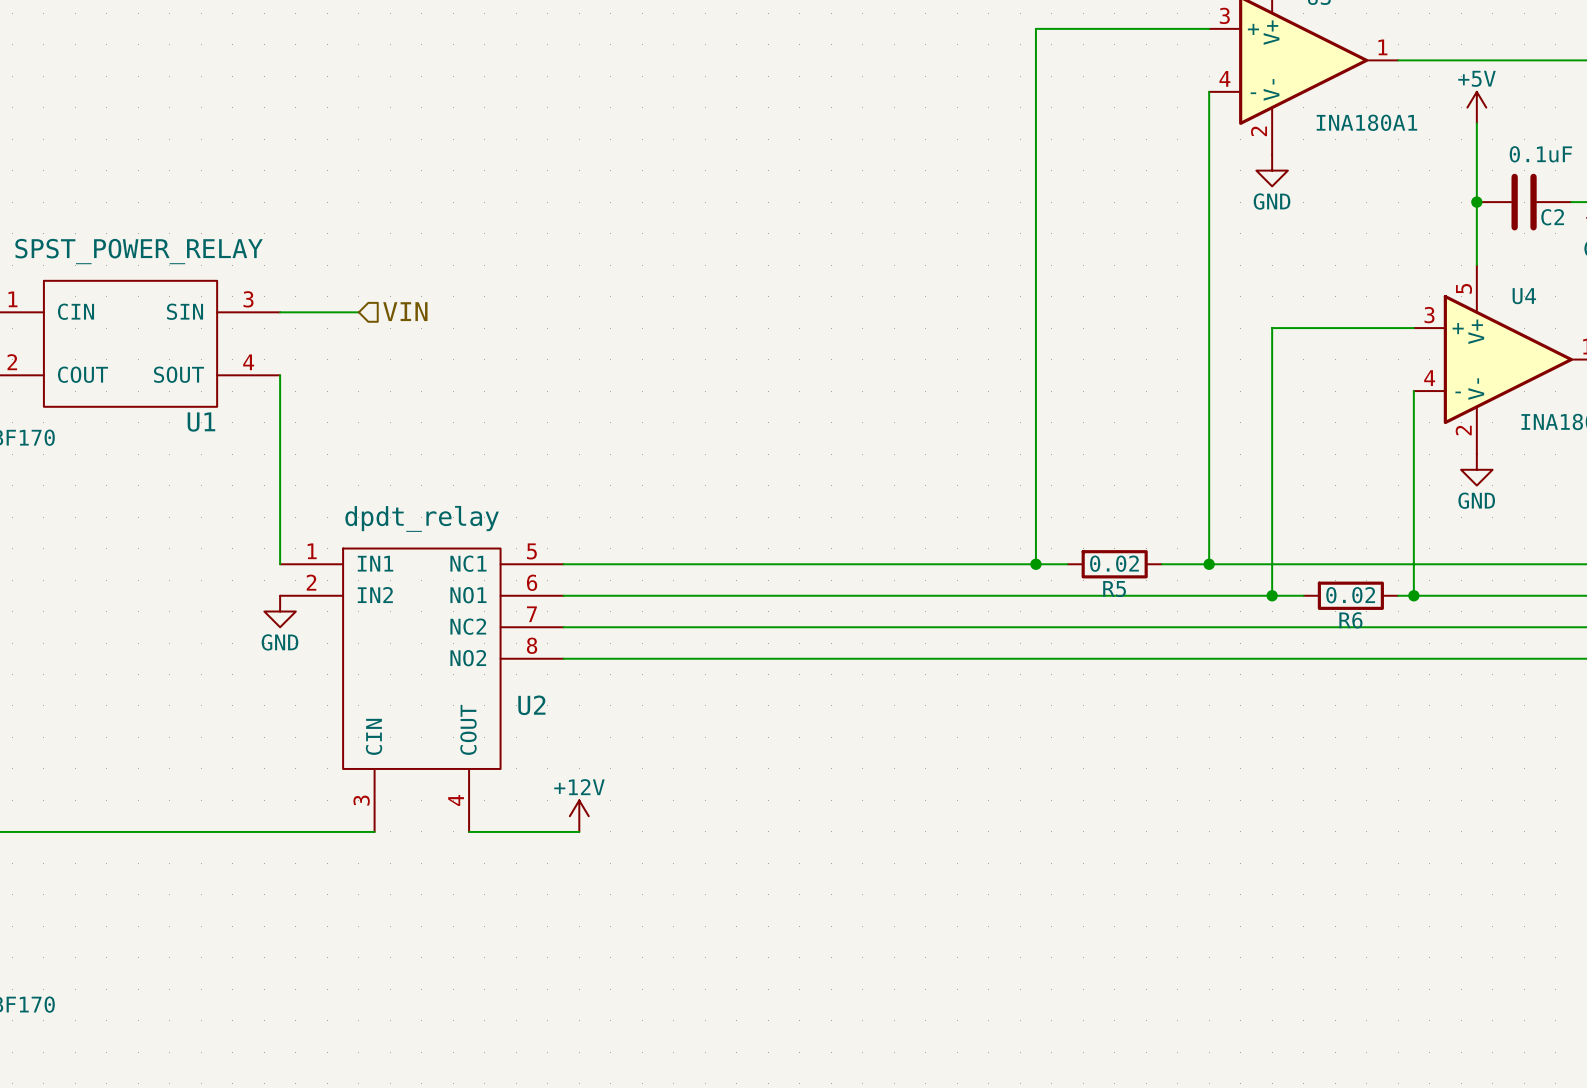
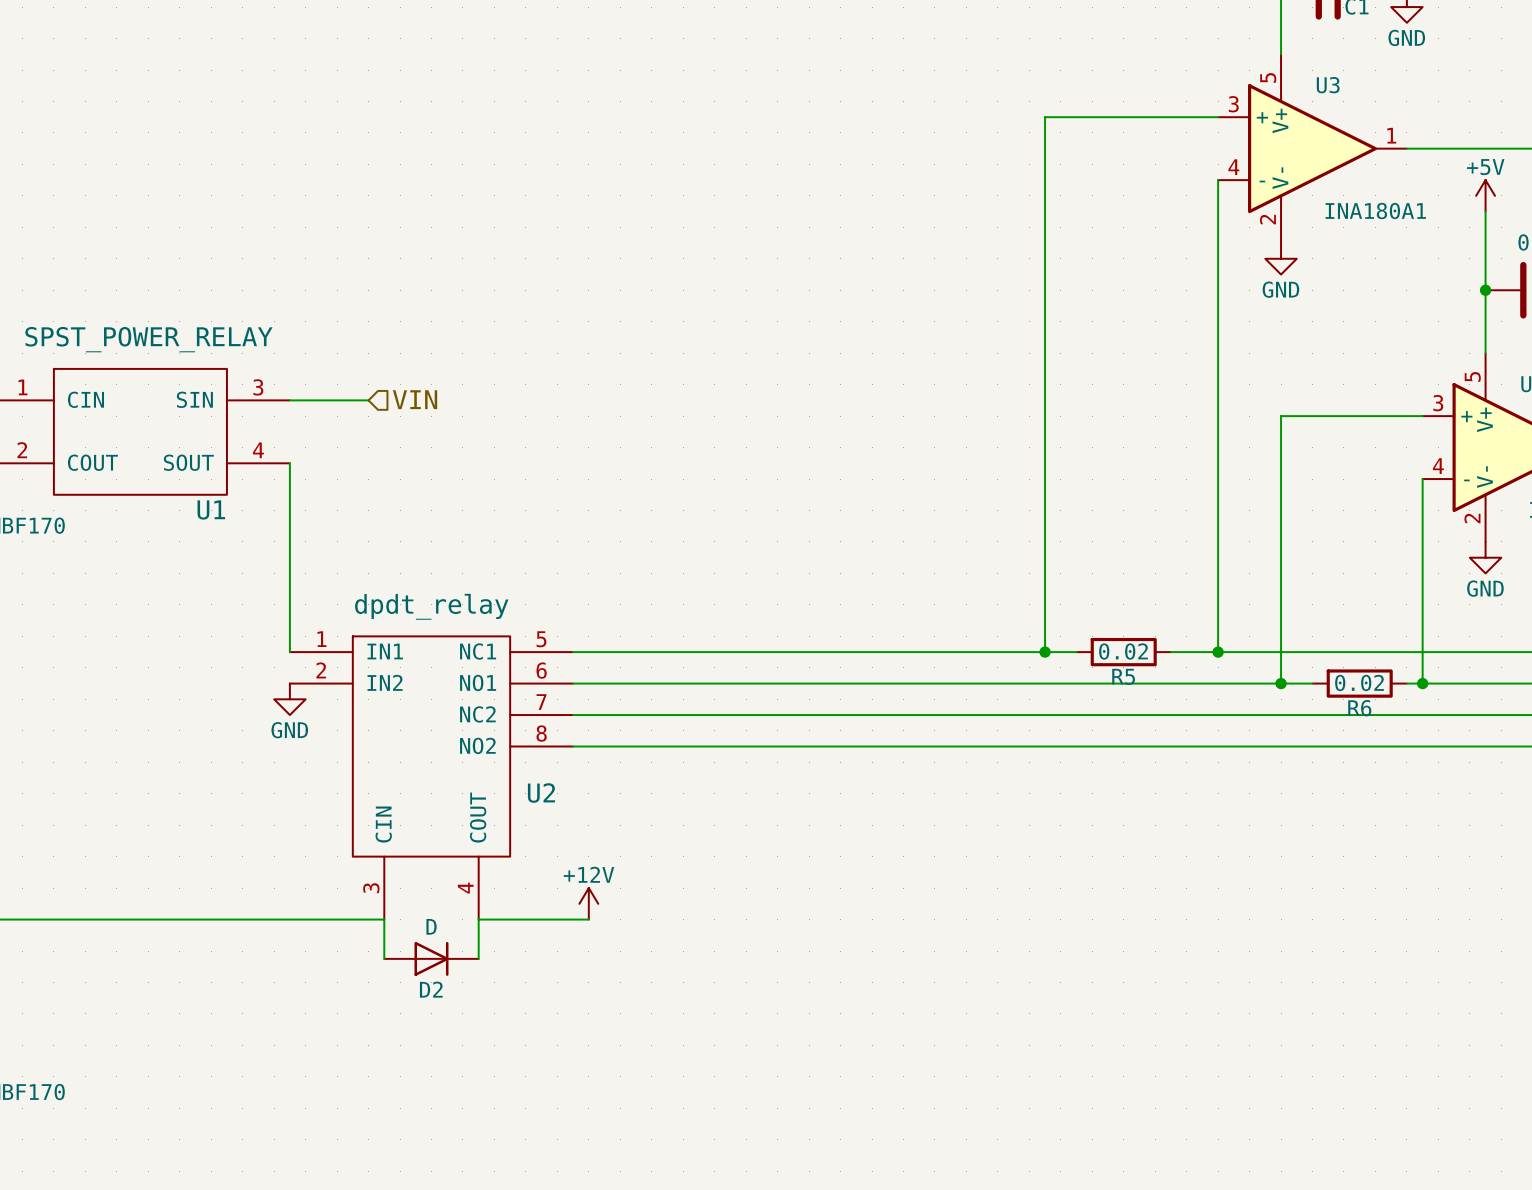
wire: none -> (384, 919) (384, 958)
wire: none -> (478, 919) (478, 958)
D2: none -> D (431, 958)

